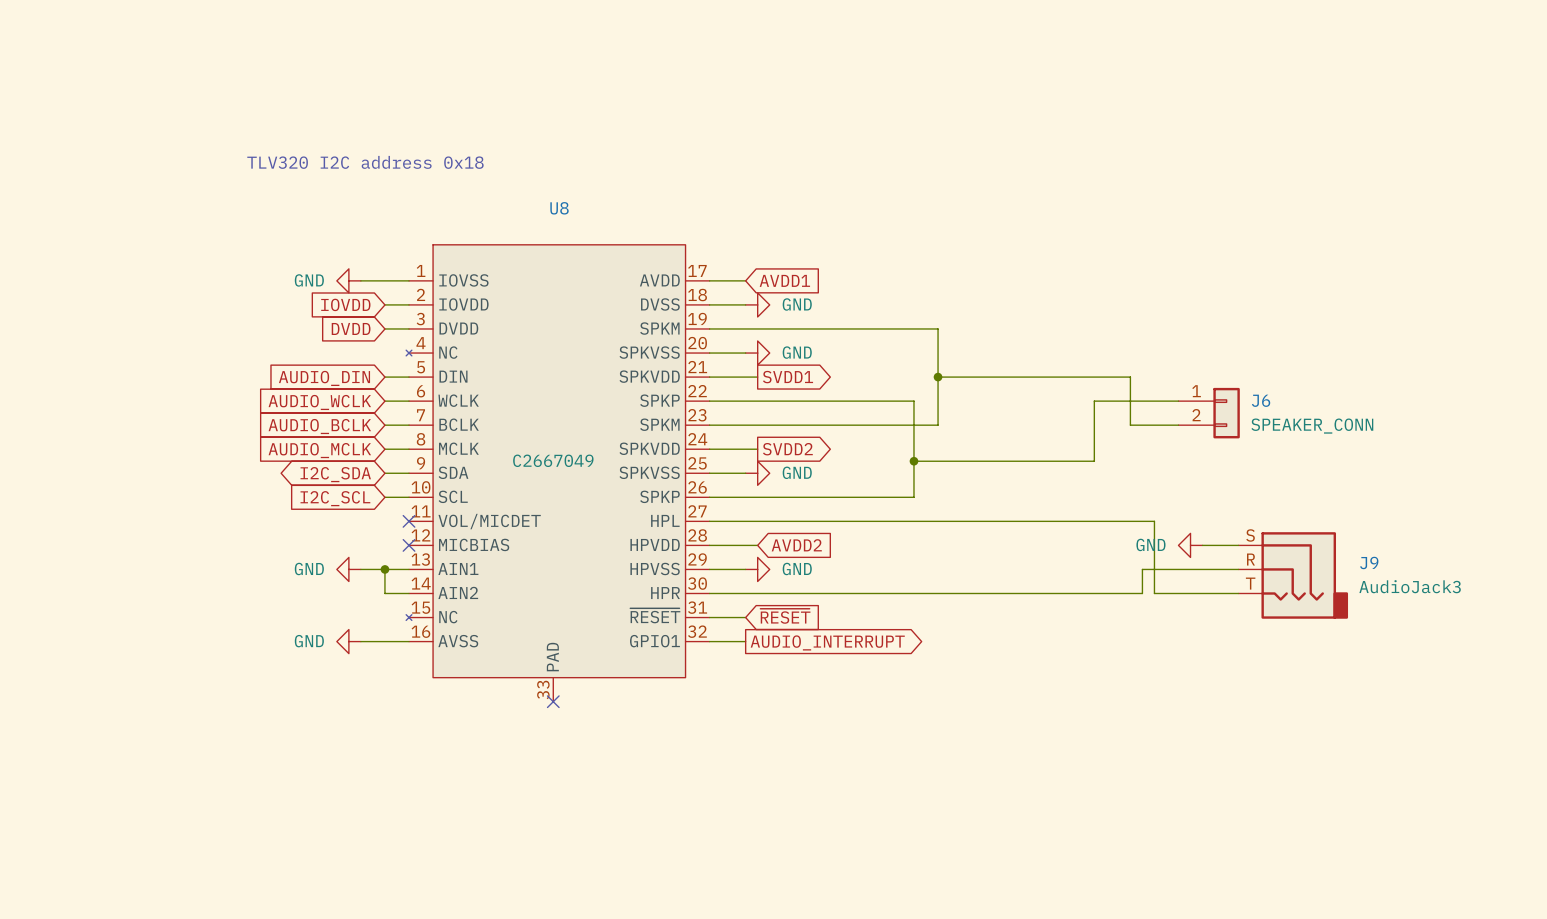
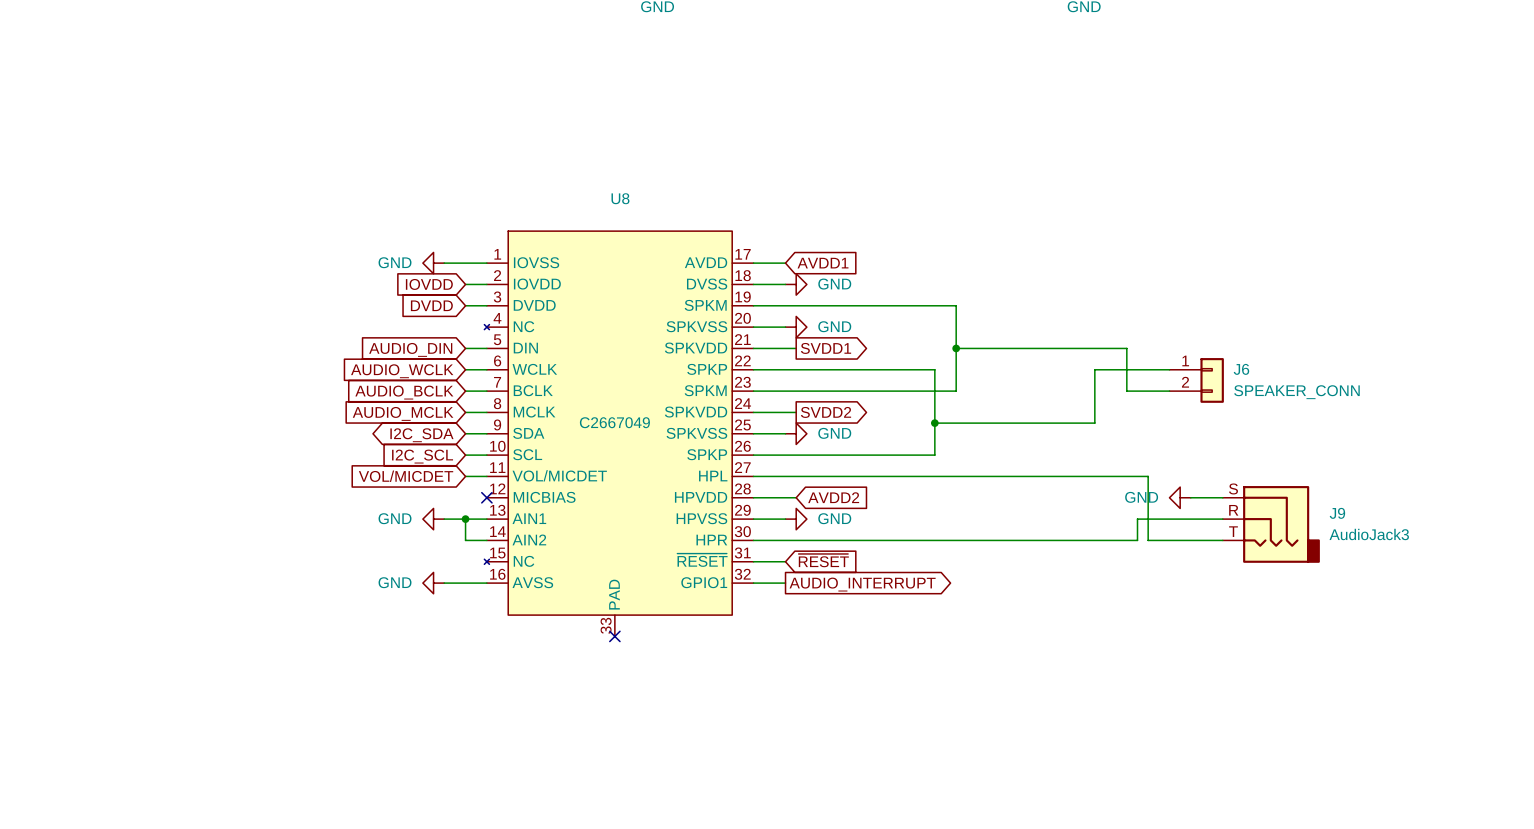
text: TLV320 I2C address 0x18 (365, 162) -> none
wire: none -> (465, 476) (486, 476)
no-connect mark: (409, 521) -> none
global label: none -> VOL/MICDET (406, 476)

